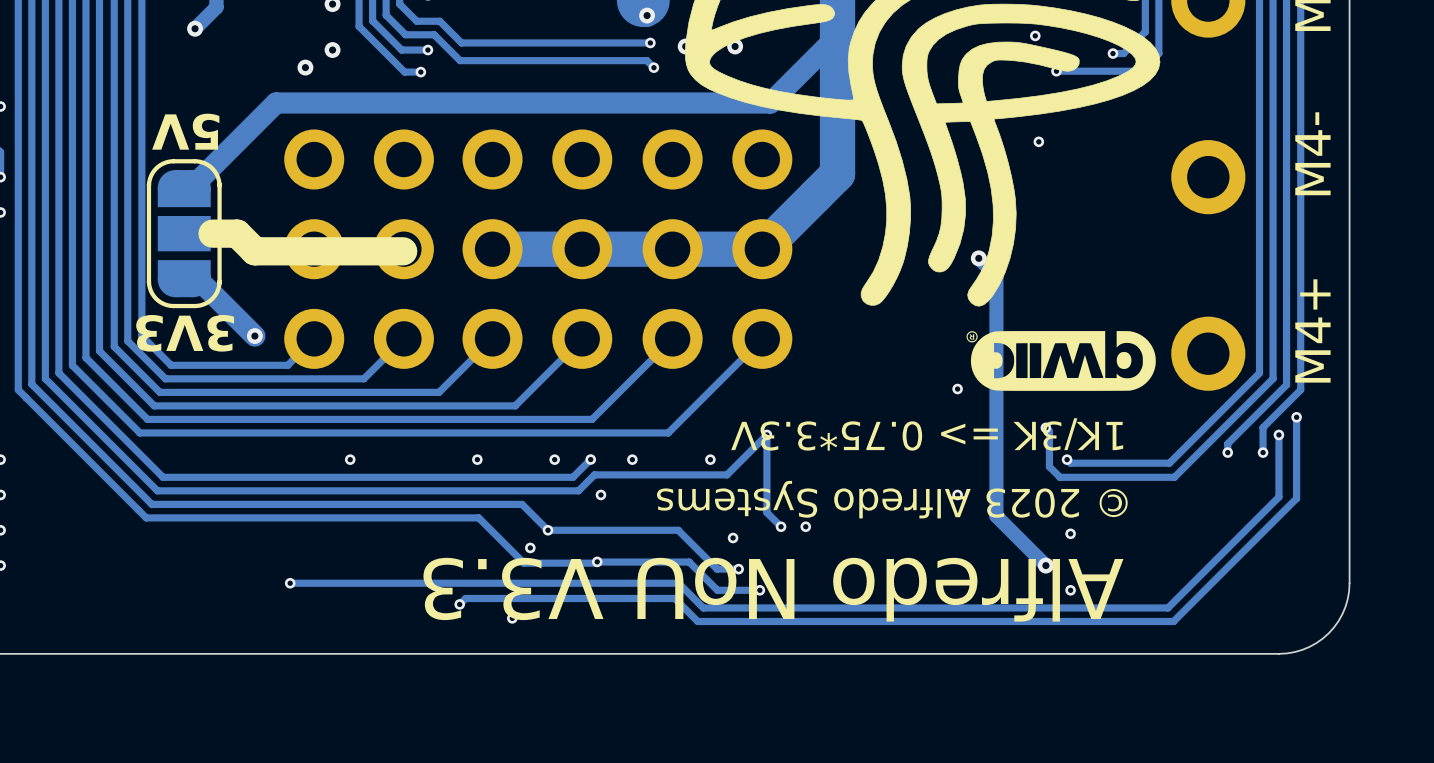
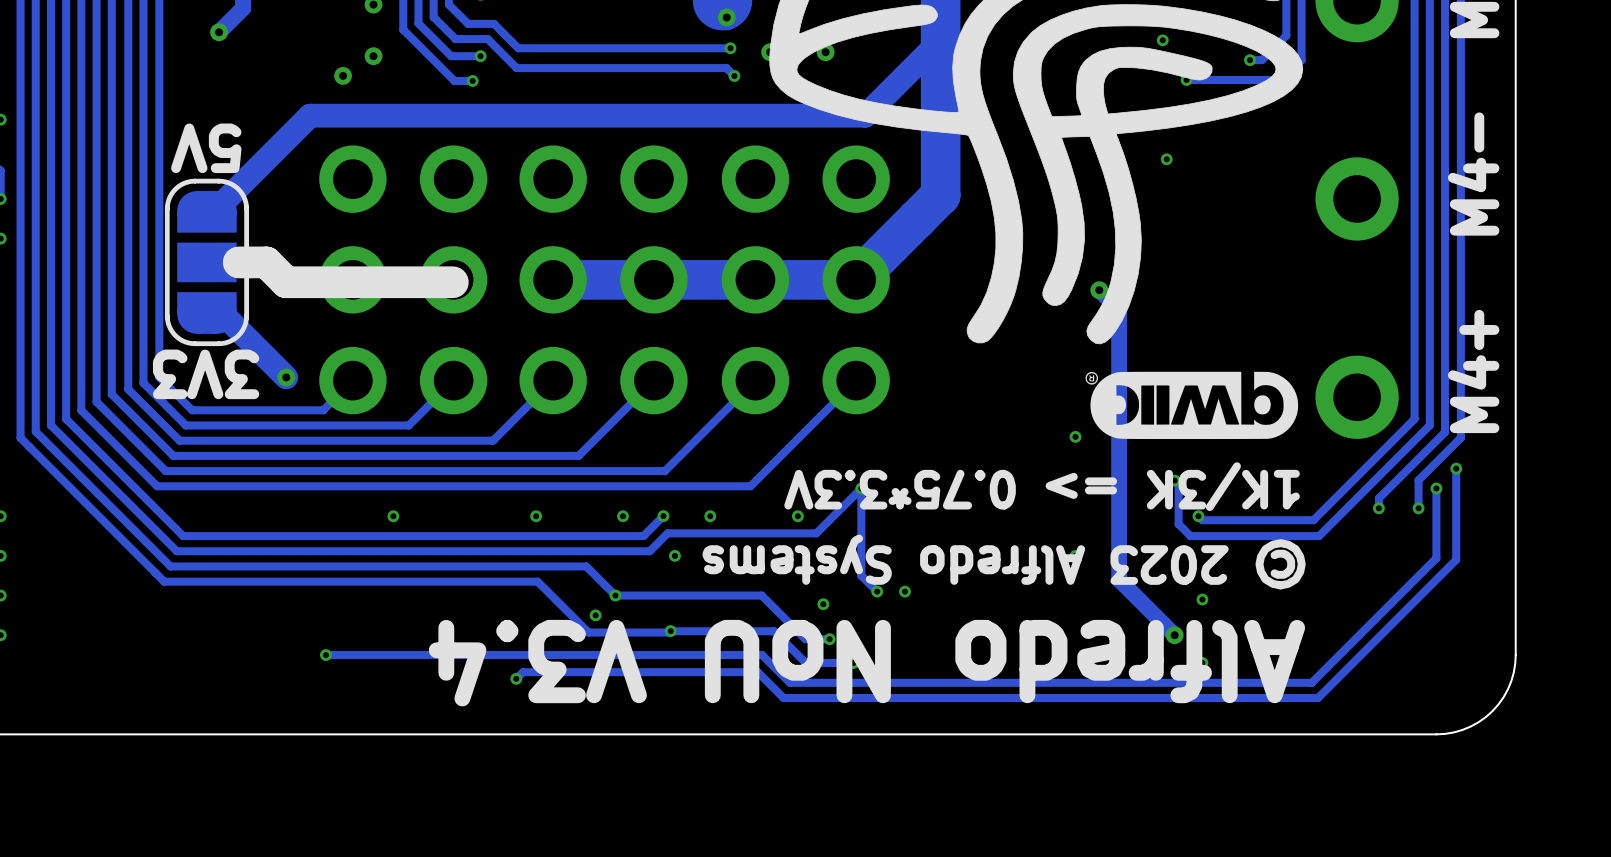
text: Alfredo NoU V3.3 (773, 589) -> Alfredo NoU V3.4 (866, 663)

